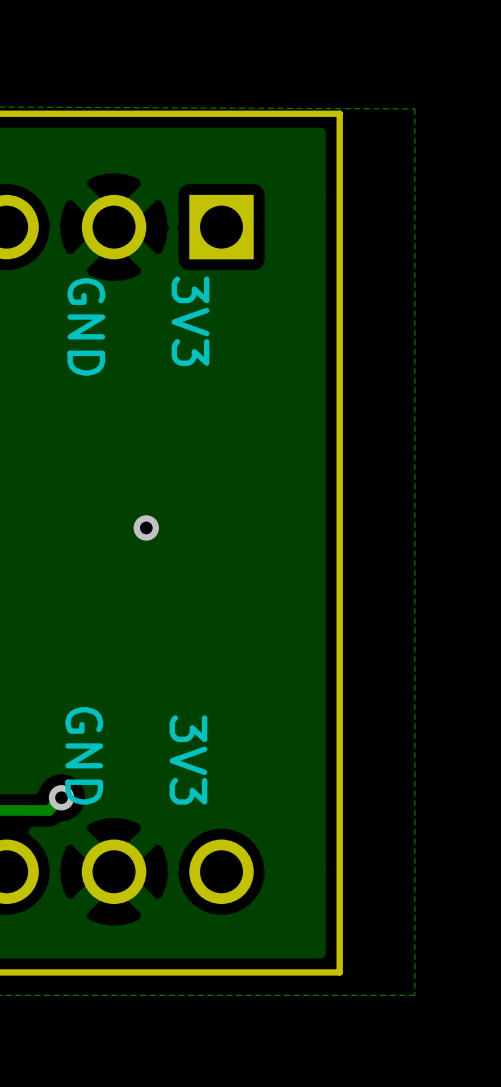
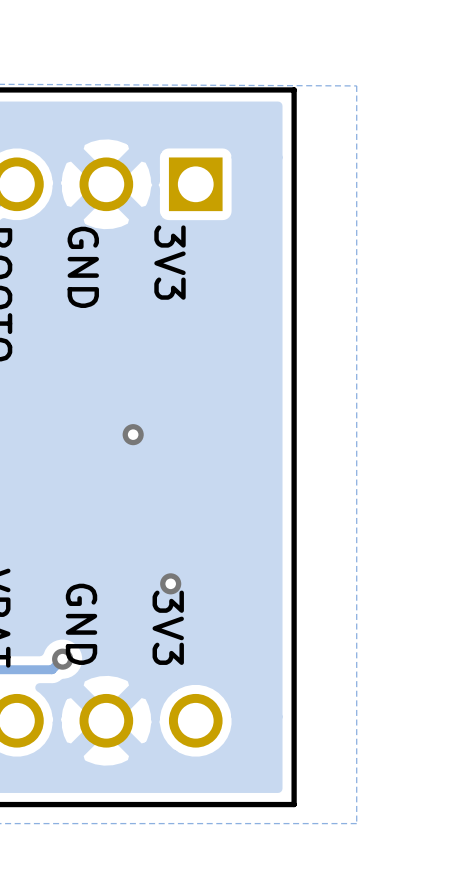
via: none -> (170, 583)

